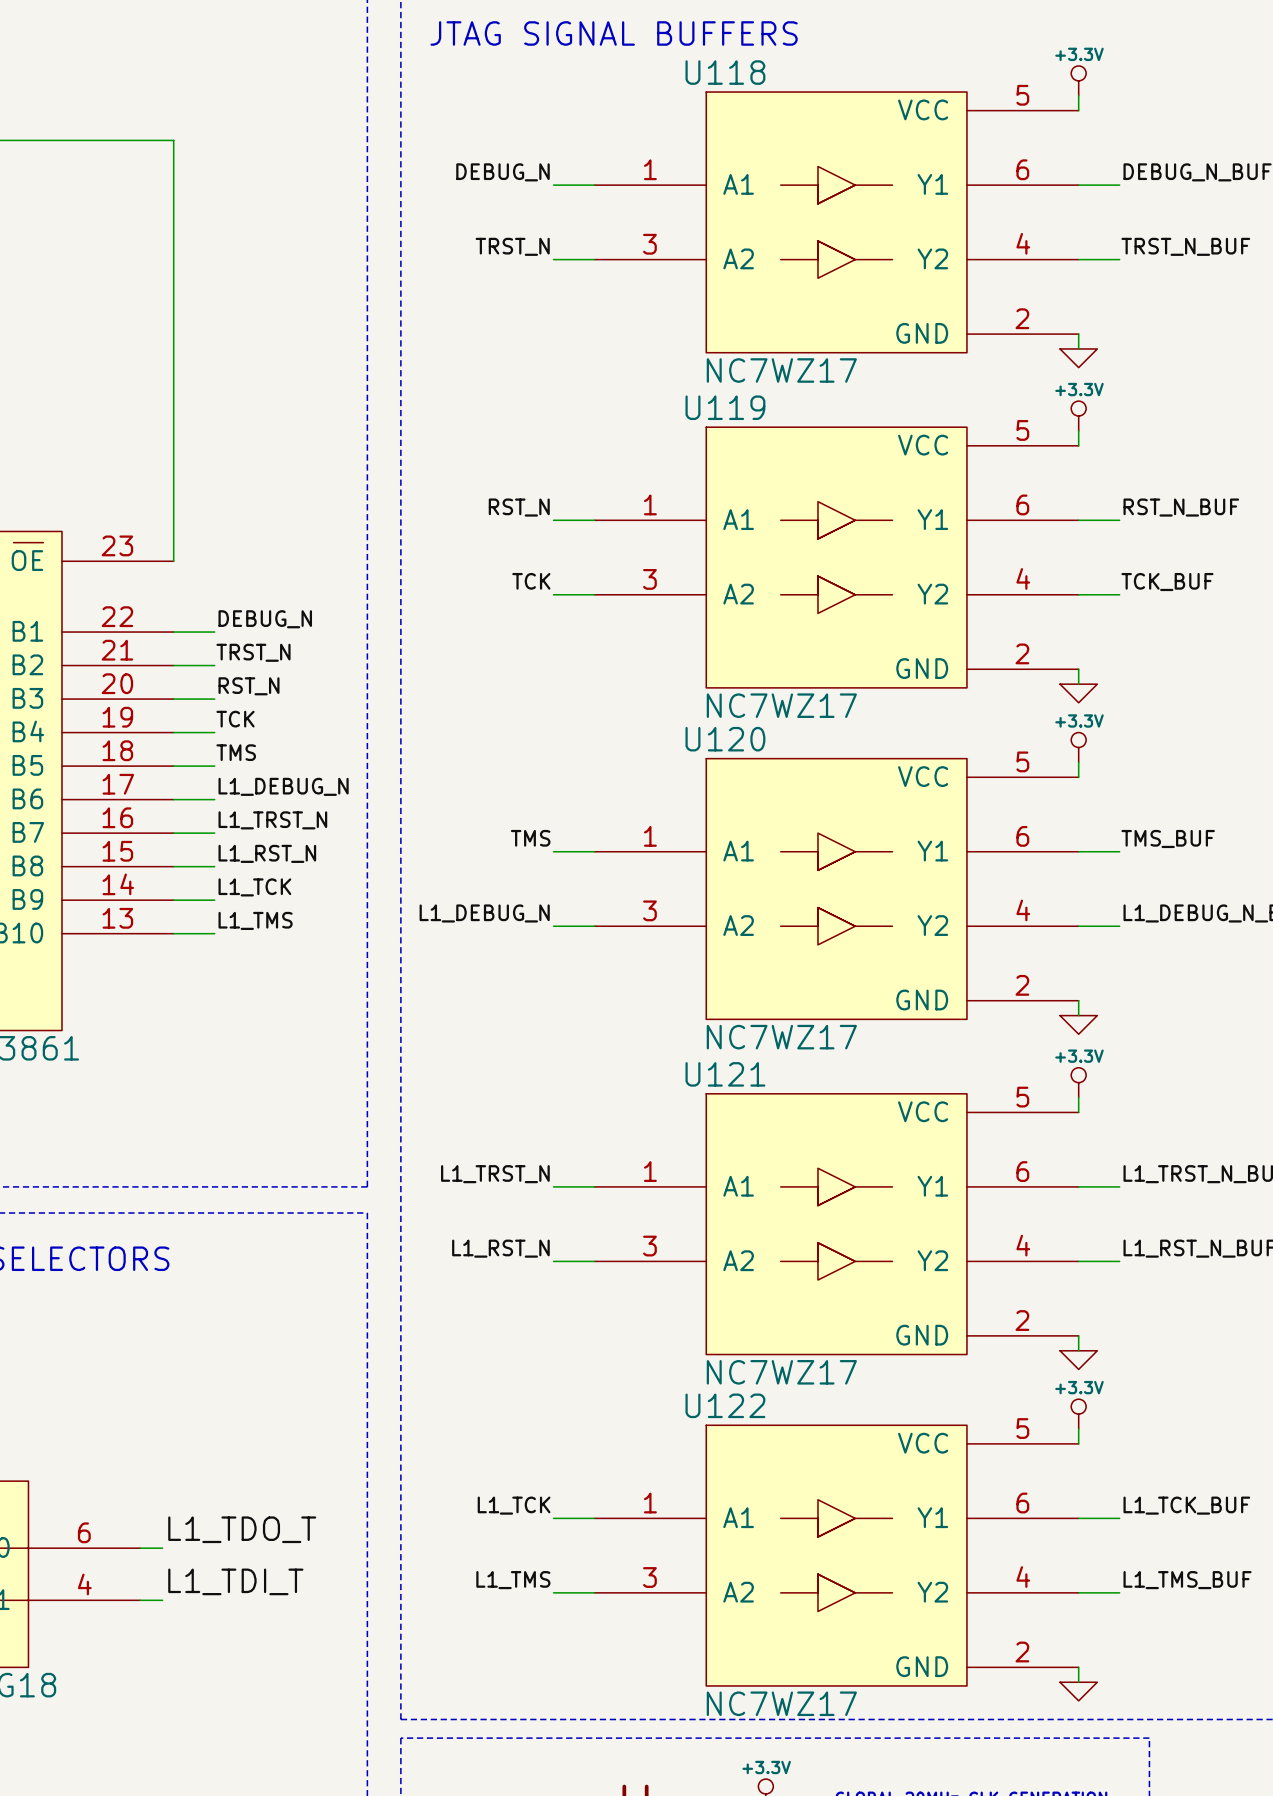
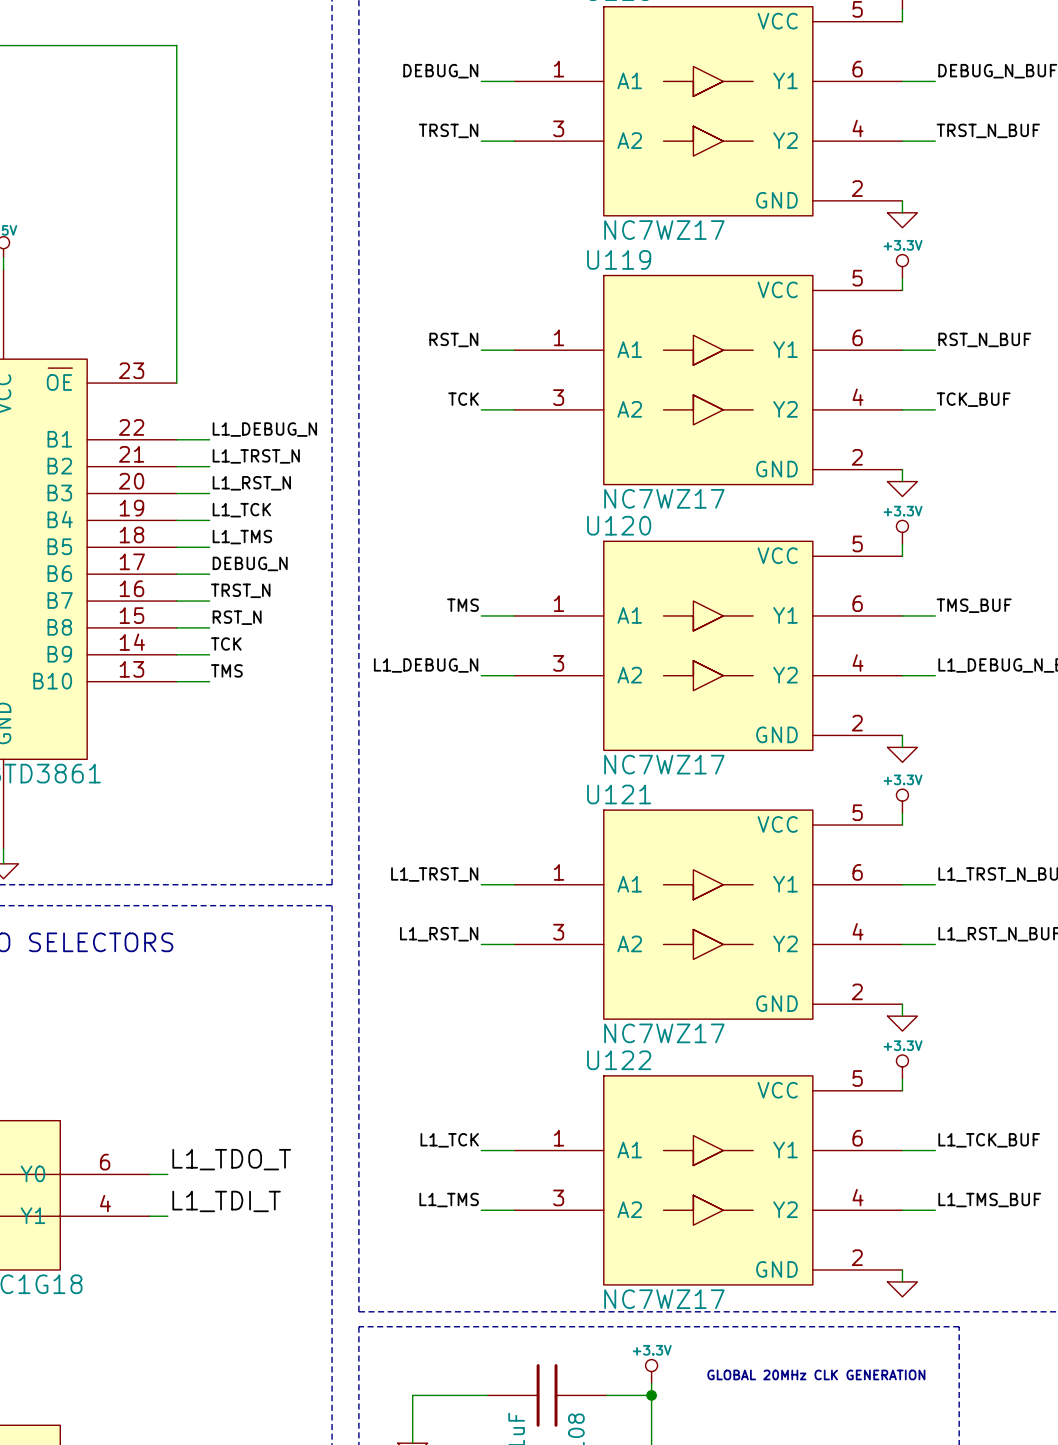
label: DEBUG_N (265, 619) -> L1_DEBUG_N (264, 429)
label: TRST_N (253, 652) -> L1_TRST_N (256, 456)
label: RST_N (248, 686) -> L1_RST_N (251, 483)
label: TCK (235, 719) -> L1_TCK (241, 510)
label: TMS (236, 752) -> L1_TMS (242, 537)
label: L1_DEBUG_N (283, 786) -> DEBUG_N (250, 563)
label: L1_TRST_N (272, 820) -> TRST_N (240, 590)
label: L1_RST_N (267, 853) -> RST_N (237, 617)
label: L1_TCK (254, 887) -> TCK (226, 644)
label: L1_TMS (255, 920) -> TMS (226, 670)

